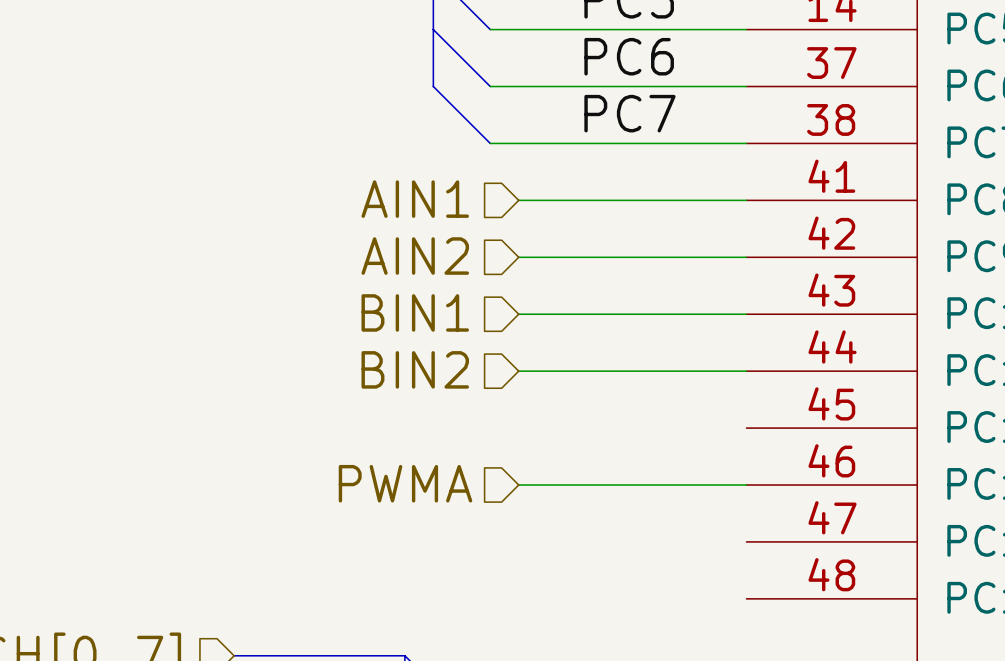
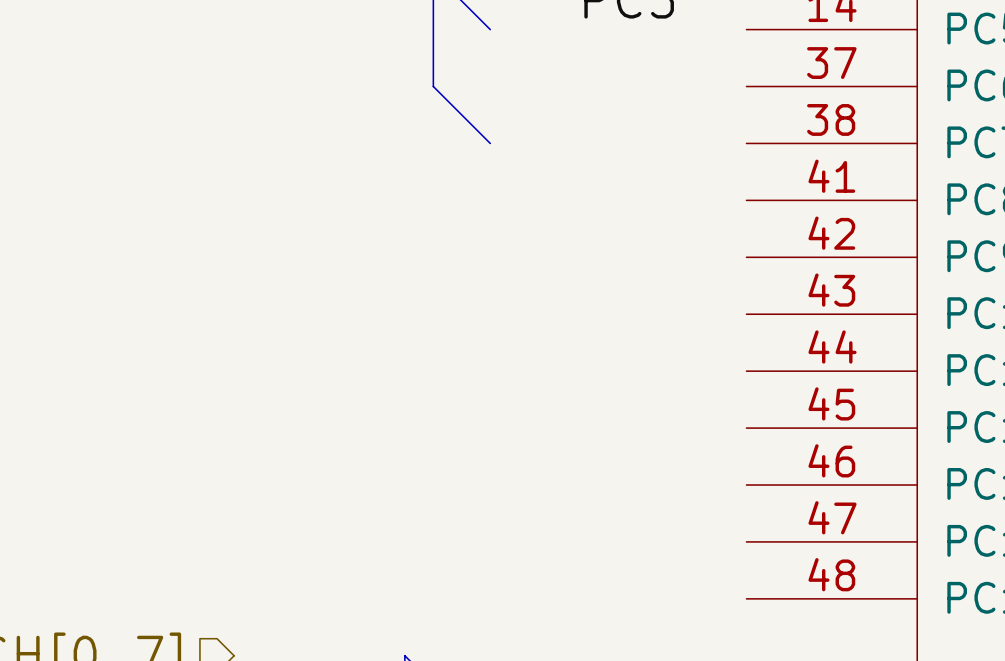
bus: (433, 29) (490, 86) -> none
wire: (490, 29) (746, 29) -> none
label: PC6 (629, 56) -> none
wire: (490, 86) (746, 86) -> none
label: PC7 (629, 113) -> none
wire: (490, 143) (746, 143) -> none
hierarchical label: AIN1 (415, 199) -> none
wire: (518, 200) (746, 200) -> none
hierarchical label: AIN2 (415, 256) -> none
wire: (518, 257) (746, 257) -> none
hierarchical label: BIN1 (415, 312) -> none
wire: (518, 314) (746, 314) -> none
hierarchical label: BIN2 (415, 369) -> none
wire: (518, 371) (746, 371) -> none
hierarchical label: PWMA (405, 483) -> none
wire: (518, 485) (746, 485) -> none
bus: (234, 655) (404, 655) -> none

